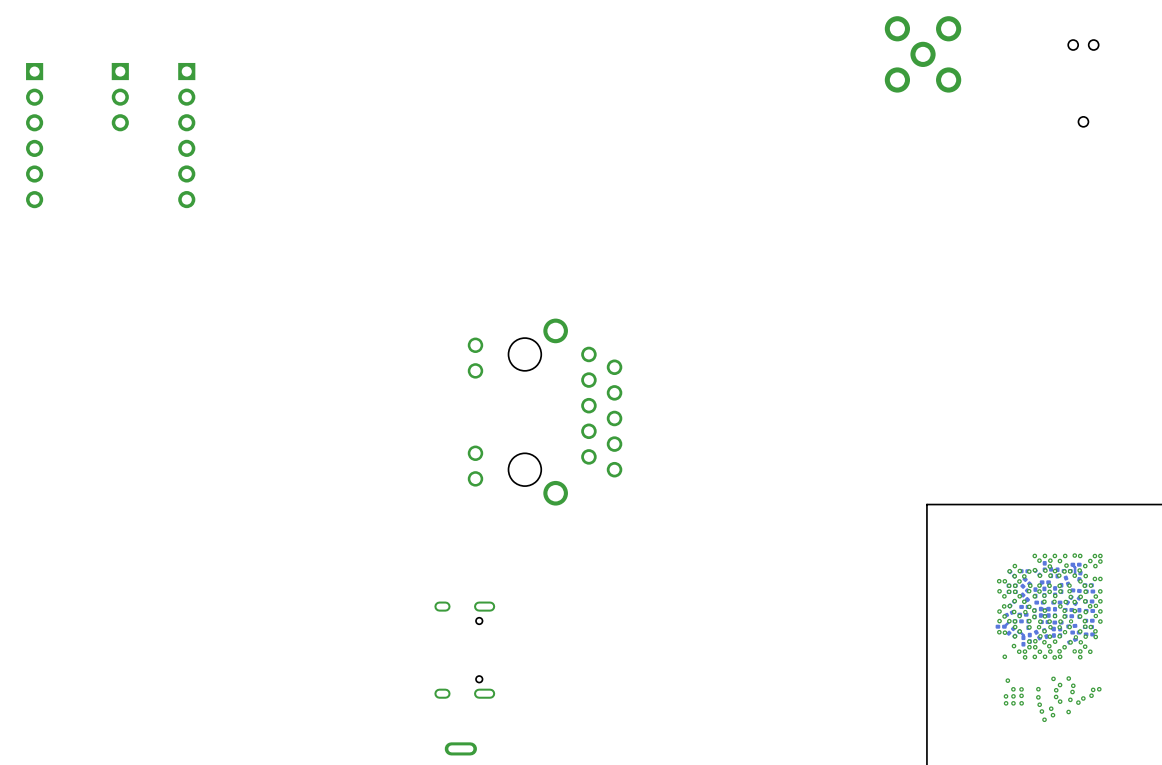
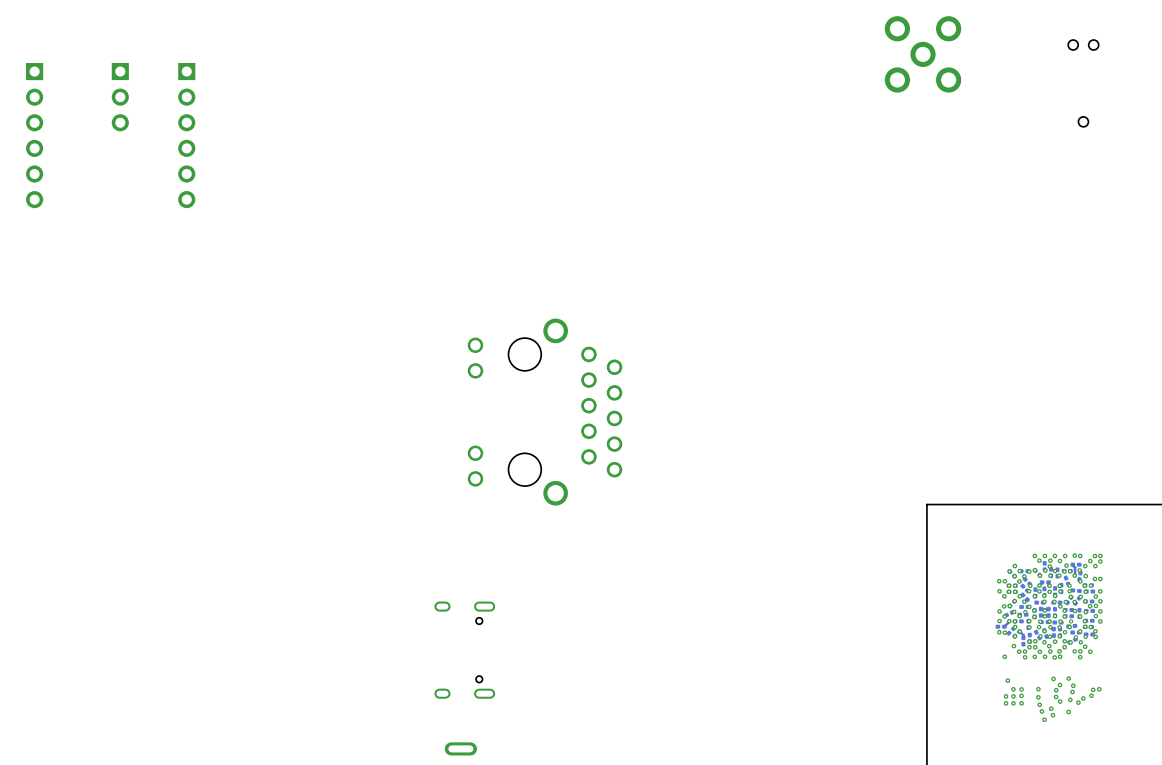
via: none -> (1064, 641)

